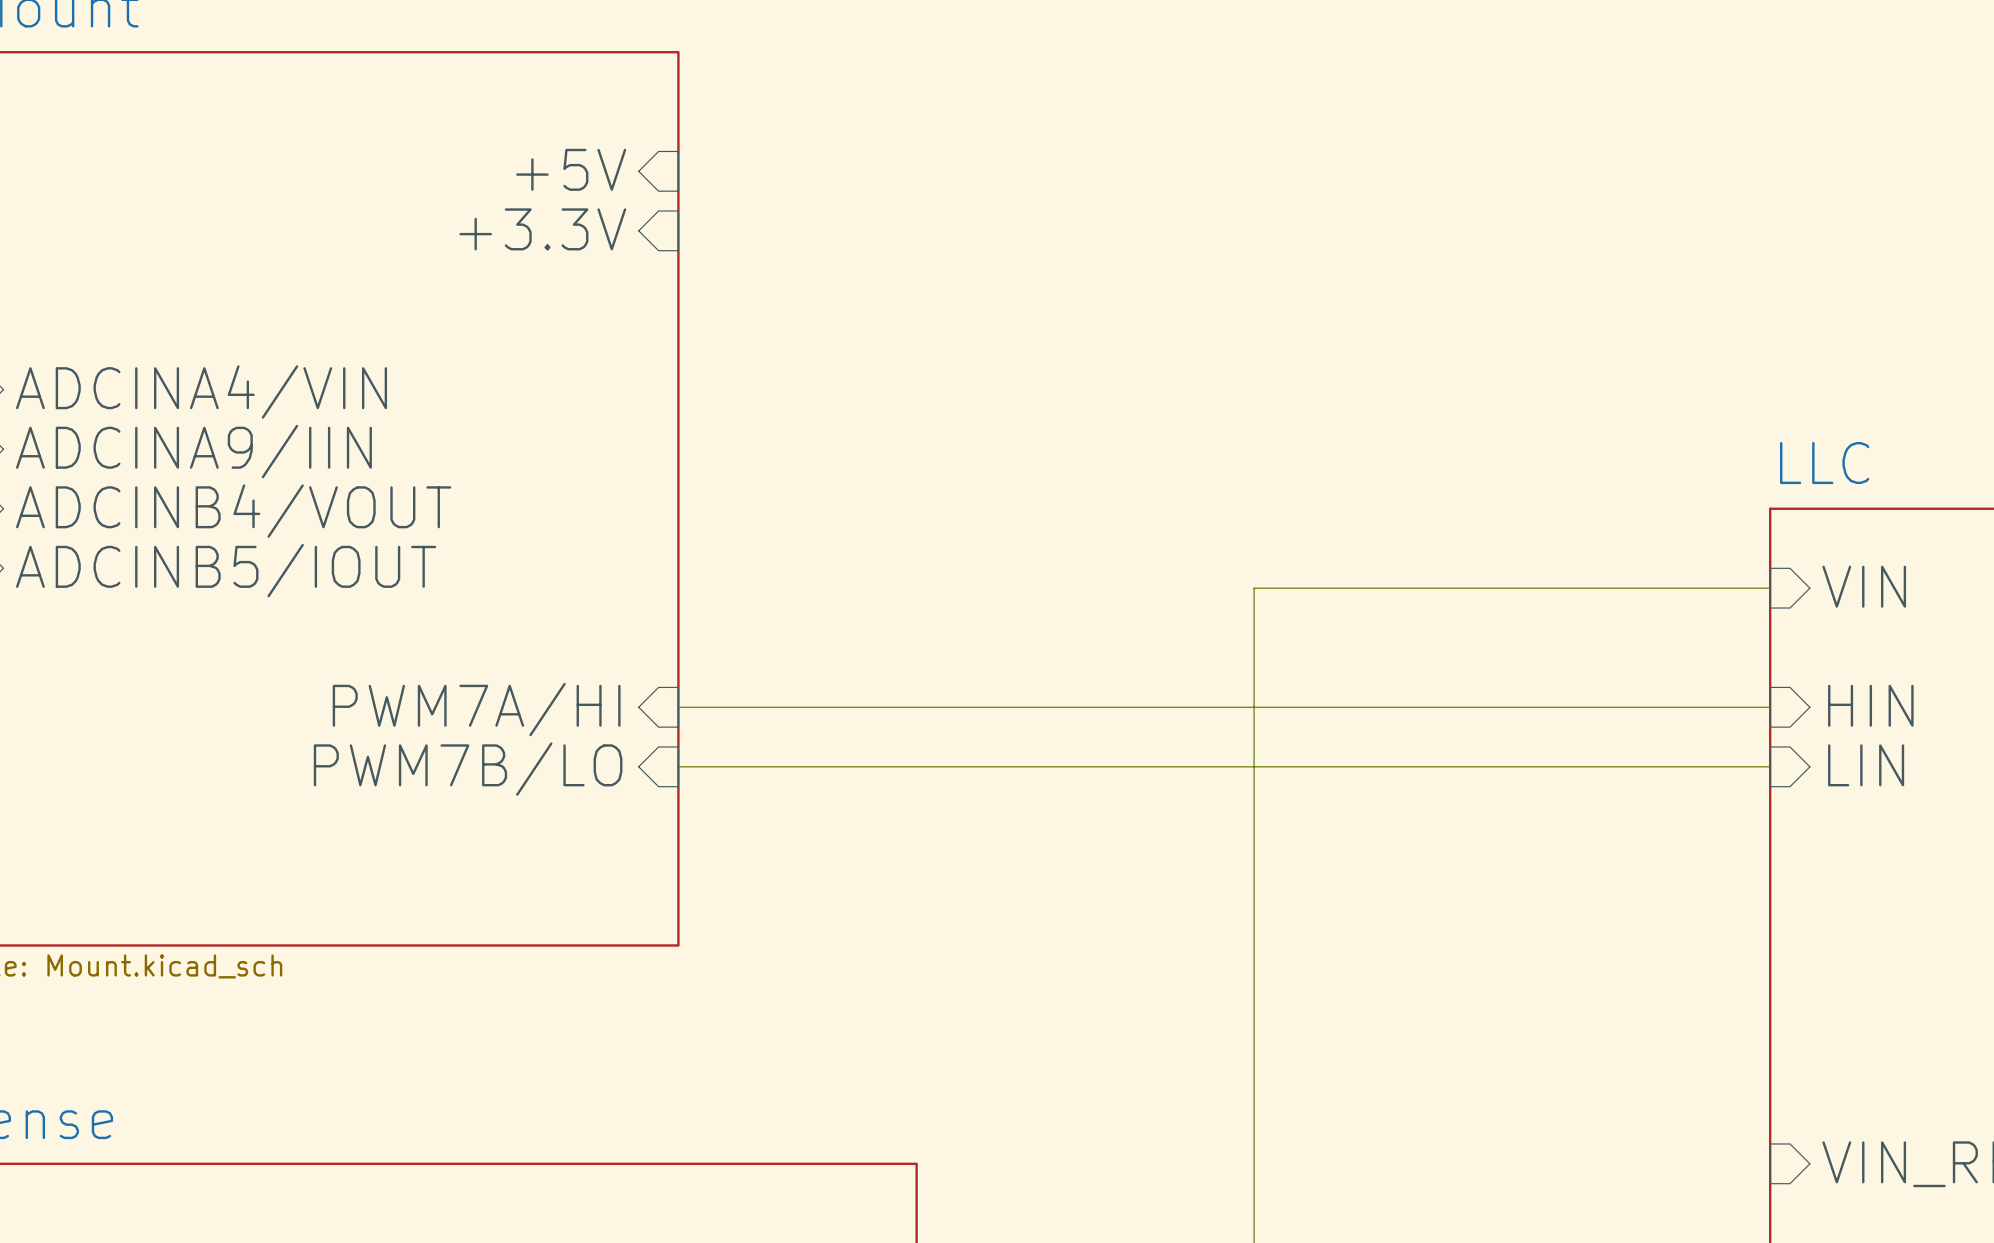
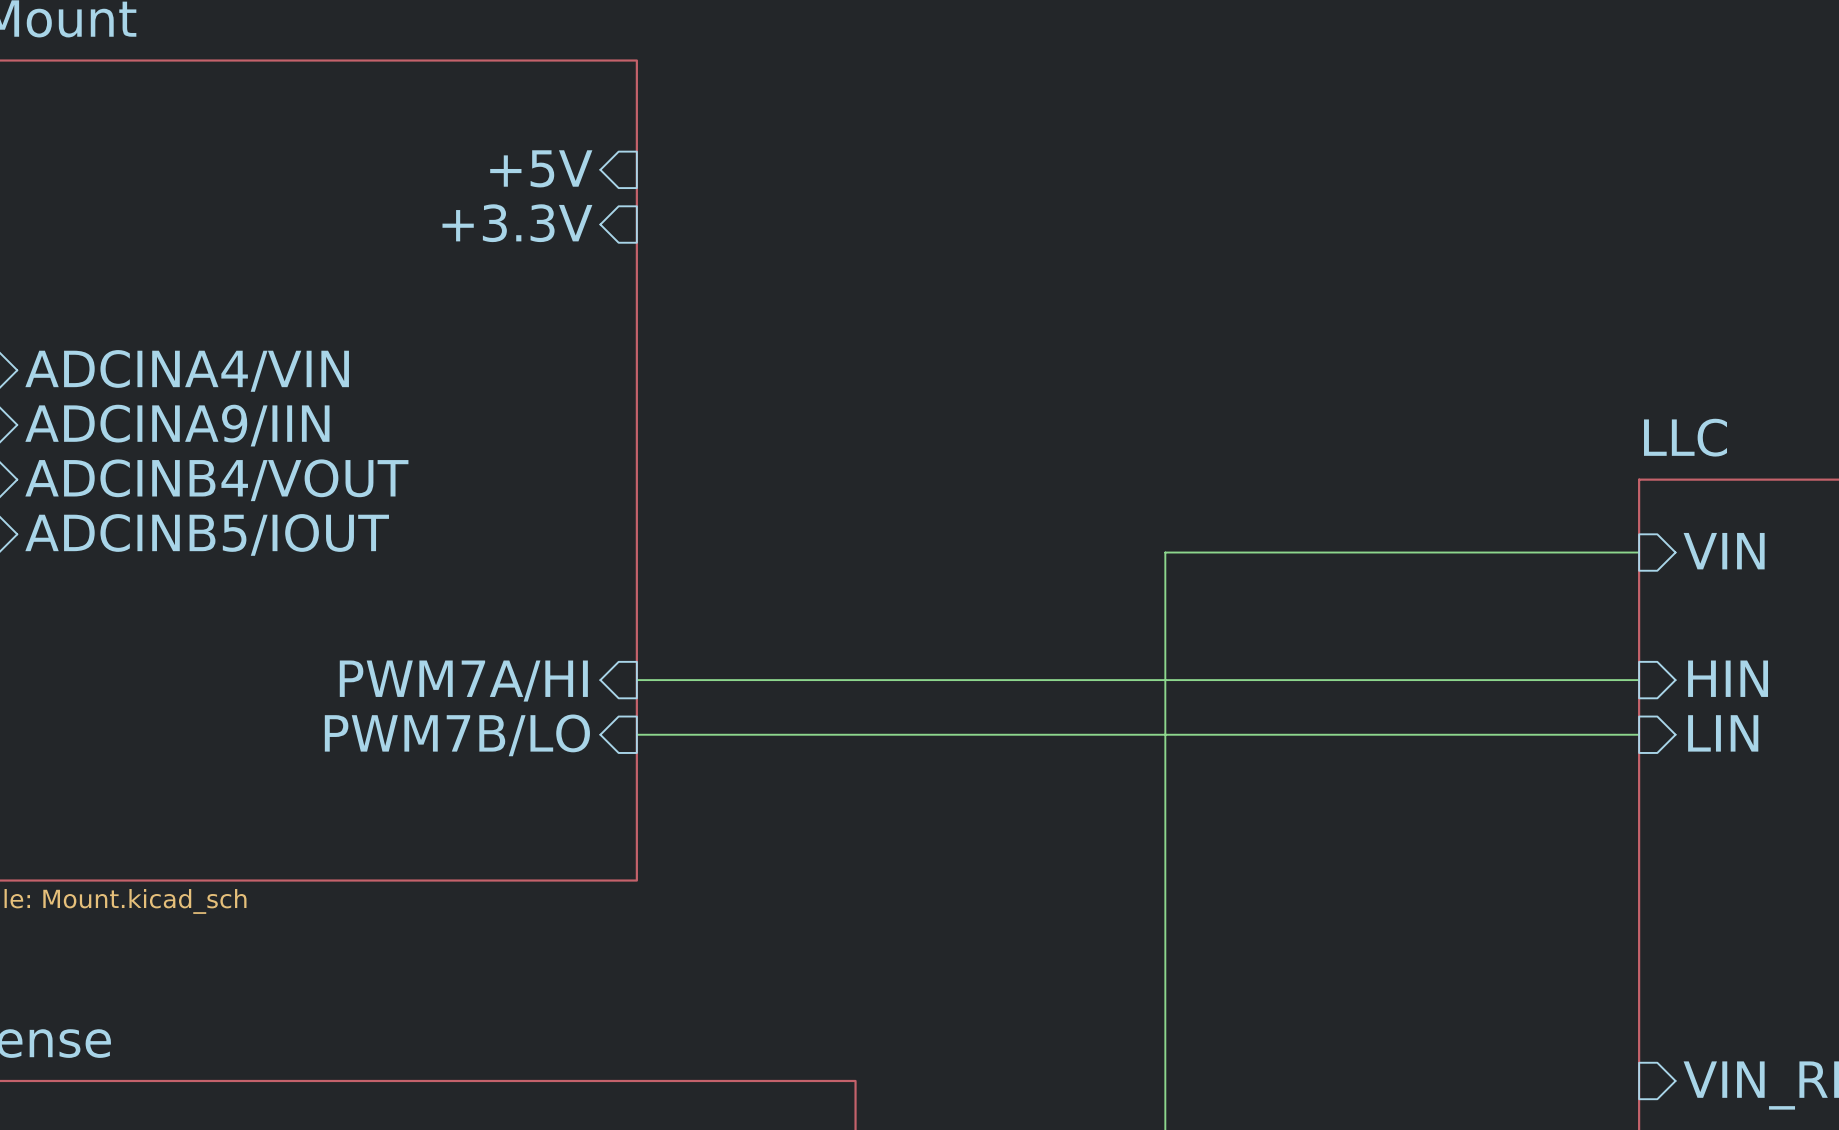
sheet pin position: HIN (1870, 705) -> HIN (1728, 678)
wire: (678, 707) (1770, 707) -> (636, 680) (1639, 680)
sheet pin position: PWM7A/HI (476, 709) -> PWM7A/HI (463, 681)
sheet pin position: LIN (1866, 765) -> LIN (1723, 733)
wire: (678, 766) (1770, 766) -> (636, 734) (1639, 734)
sheet pin position: PWM7B/LO (468, 769) -> PWM7B/LO (457, 735)

